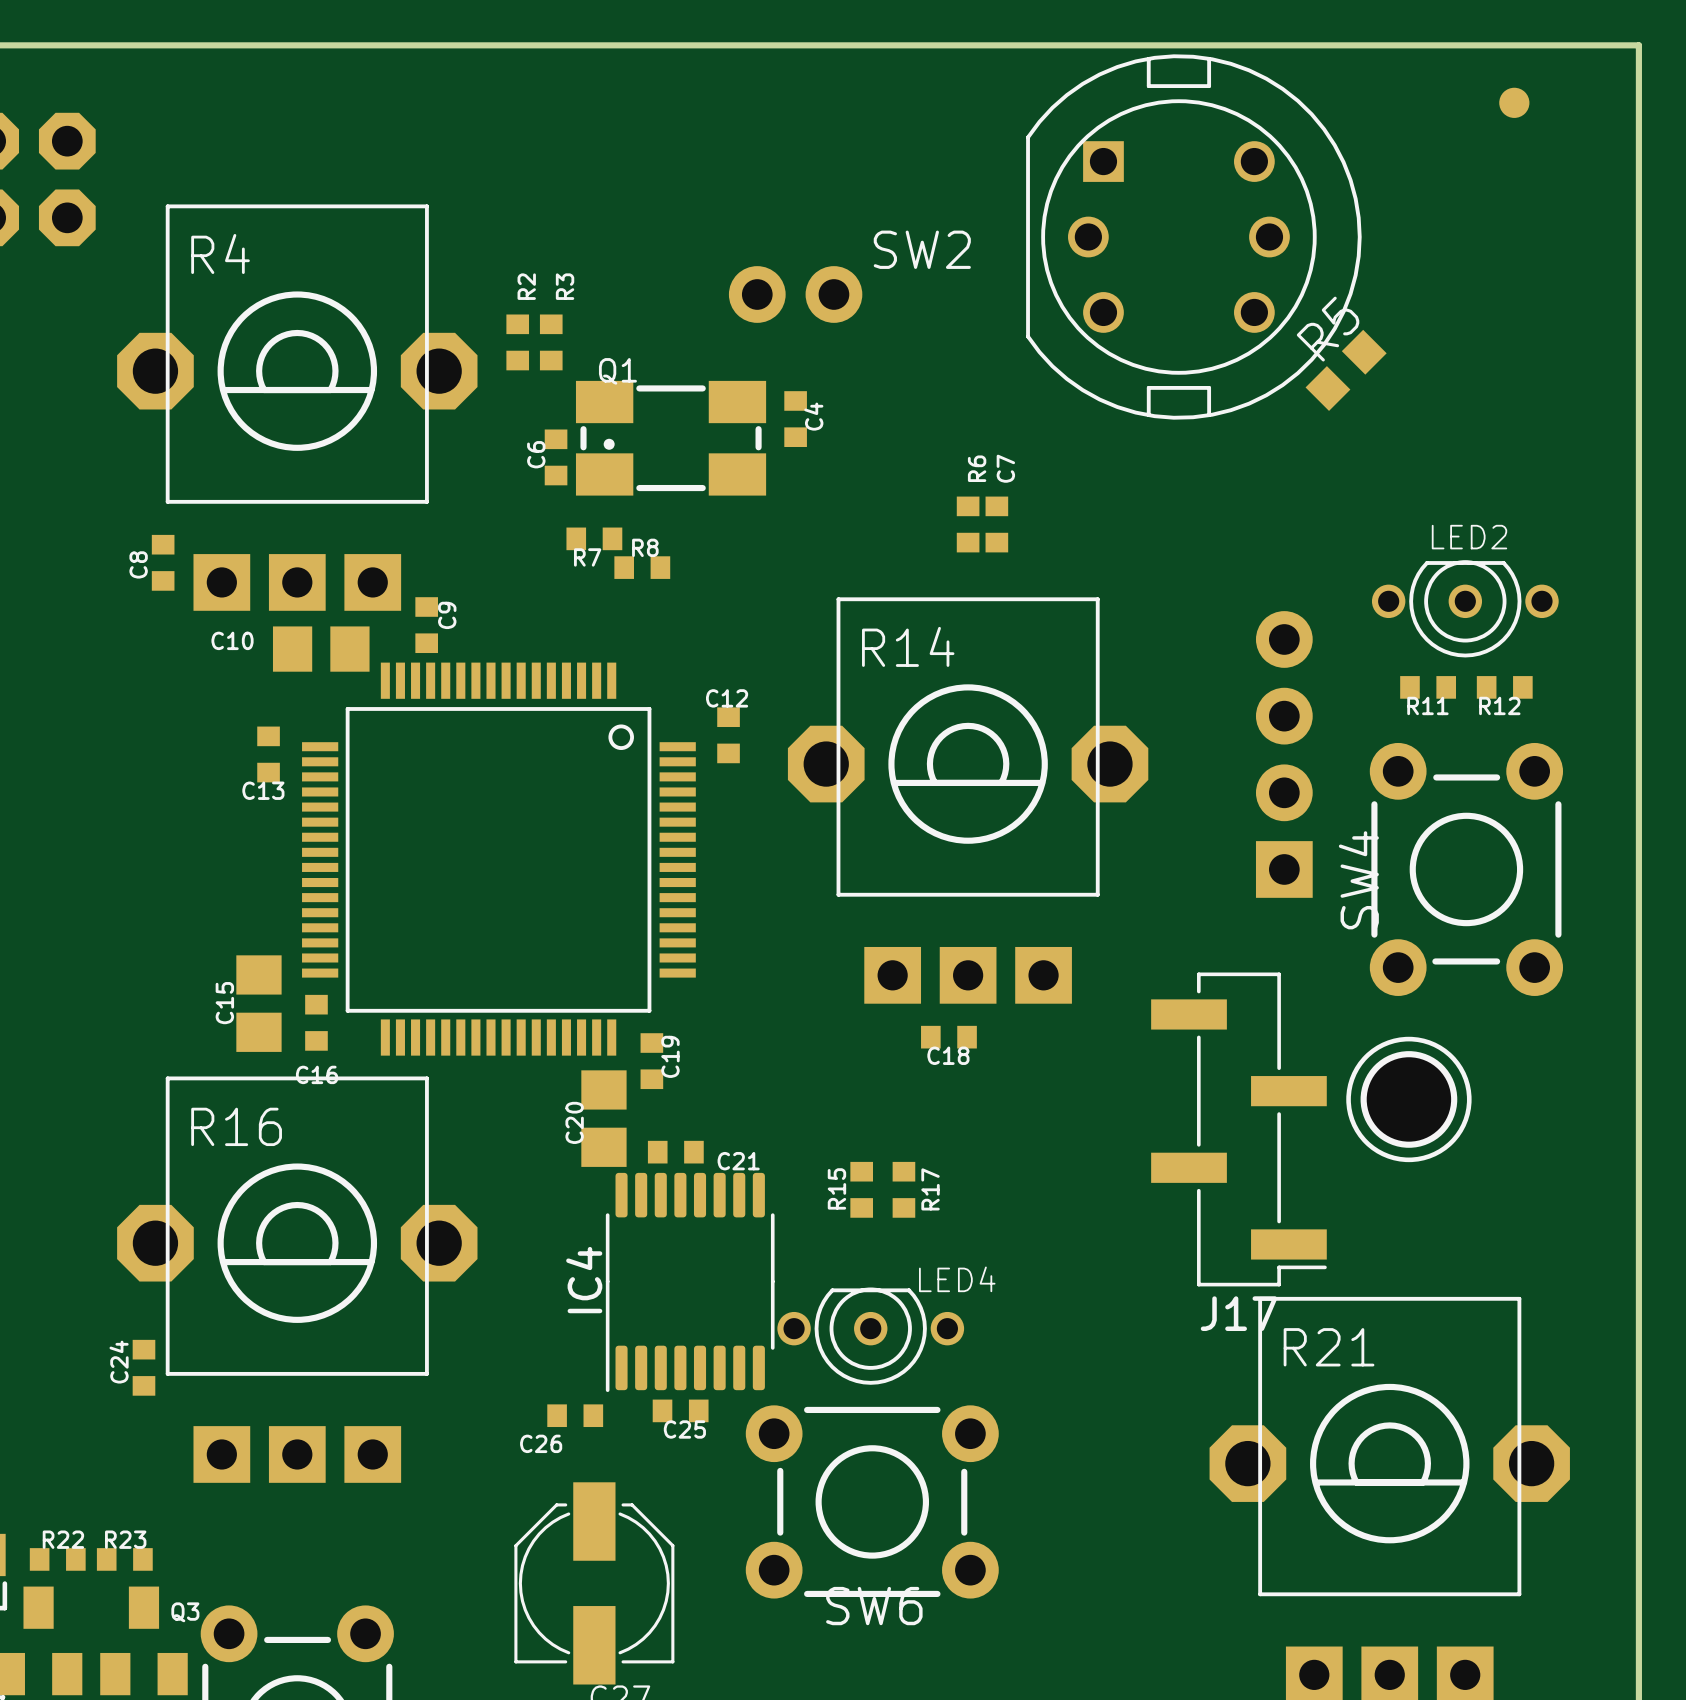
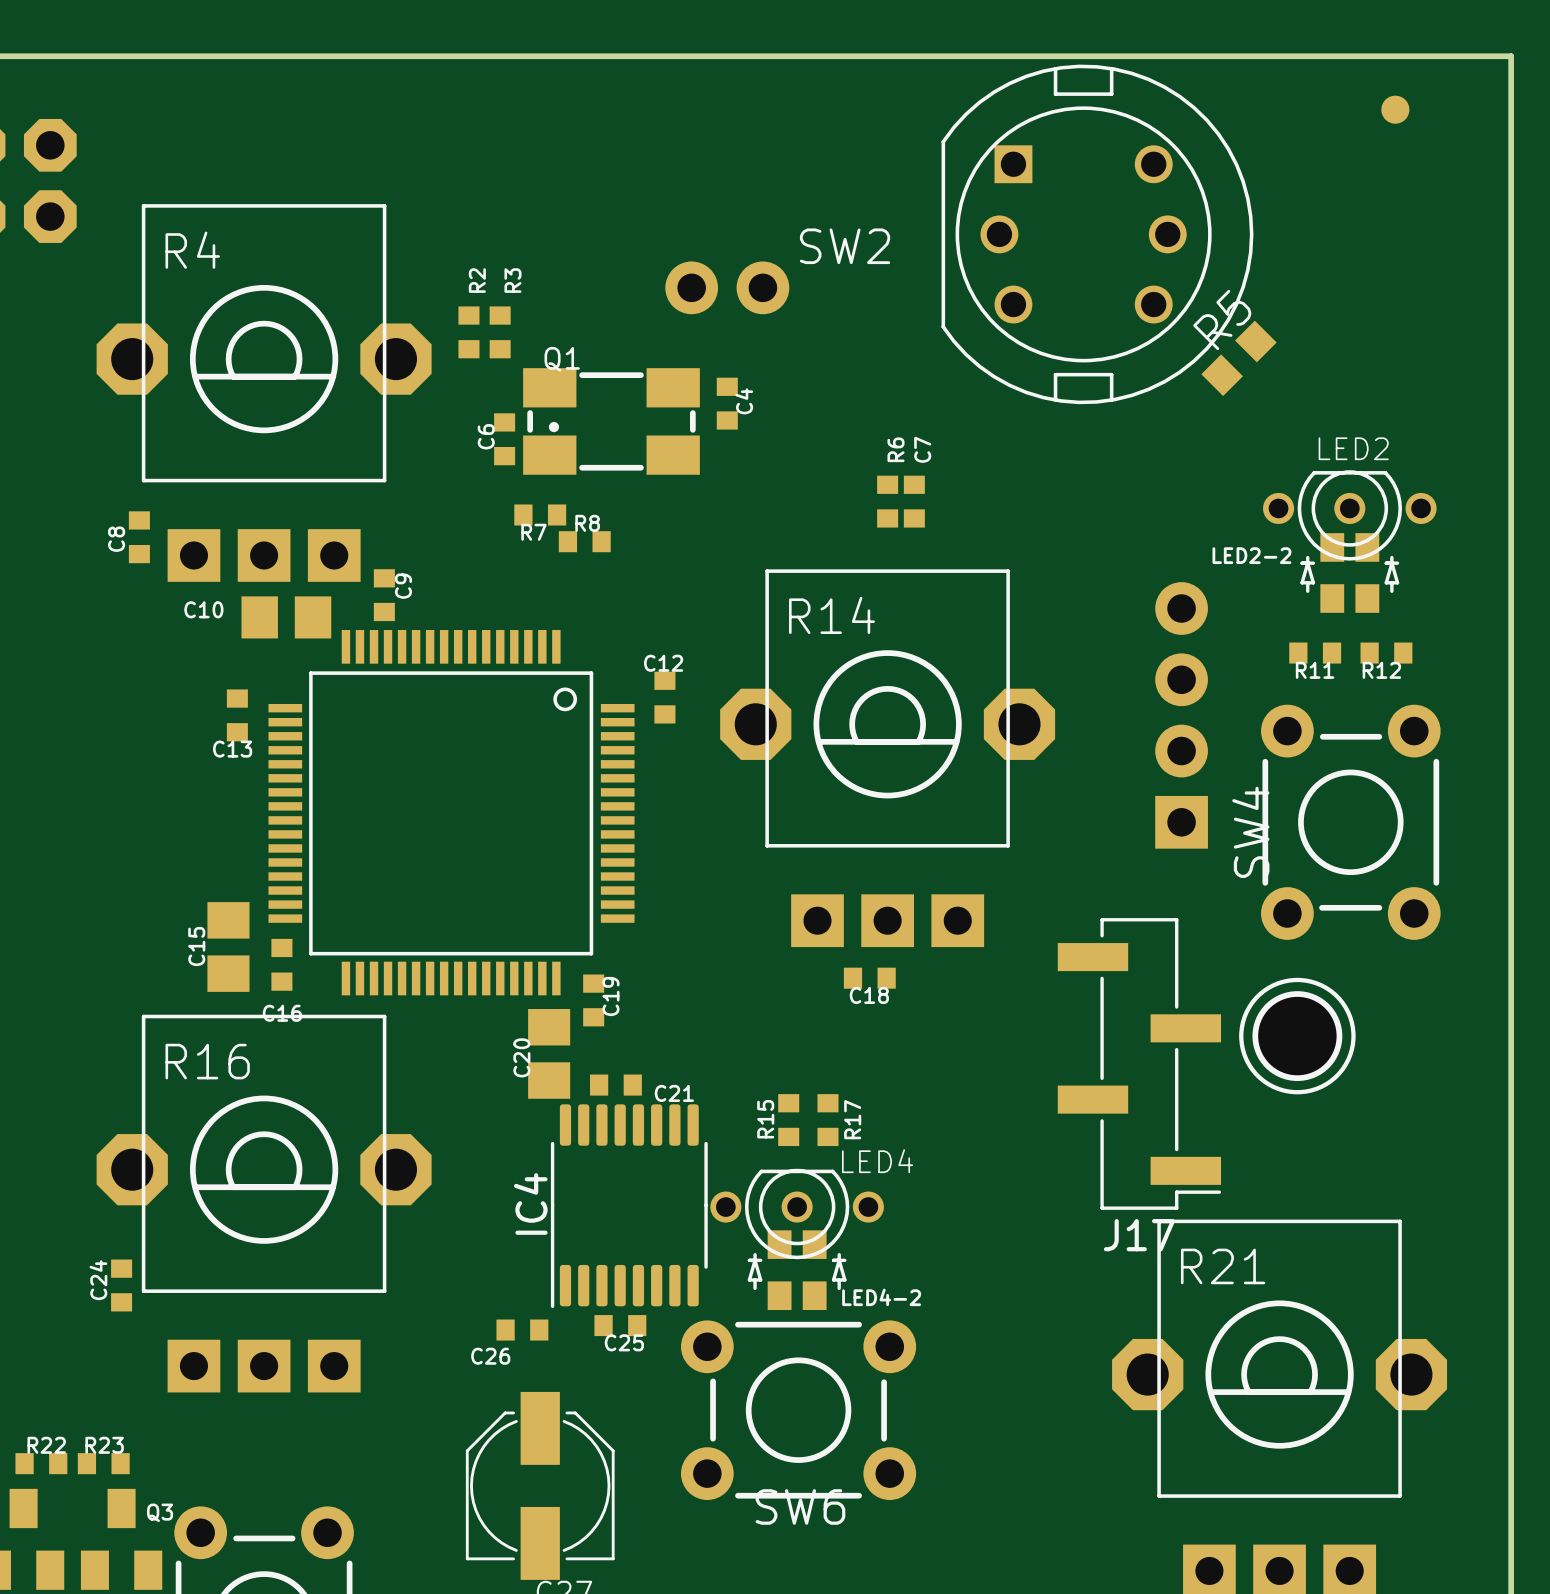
LED2-2: none -> (1349, 572)
LED2 position: (1465, 608) -> (1349, 515)
LED4 position: (870, 1336) -> (797, 1214)
LED4-2: none -> (797, 1270)

